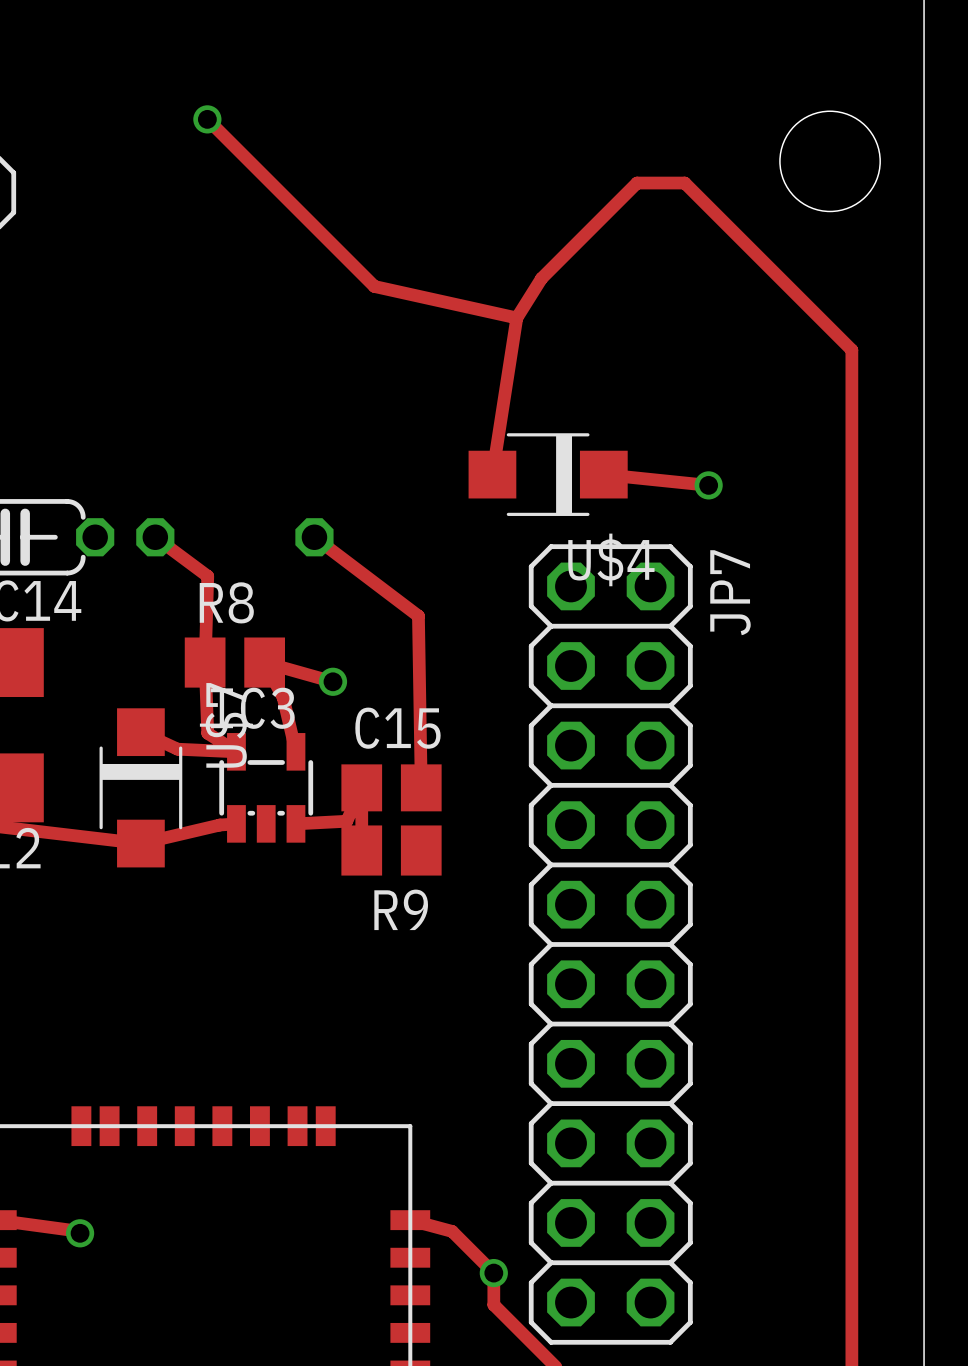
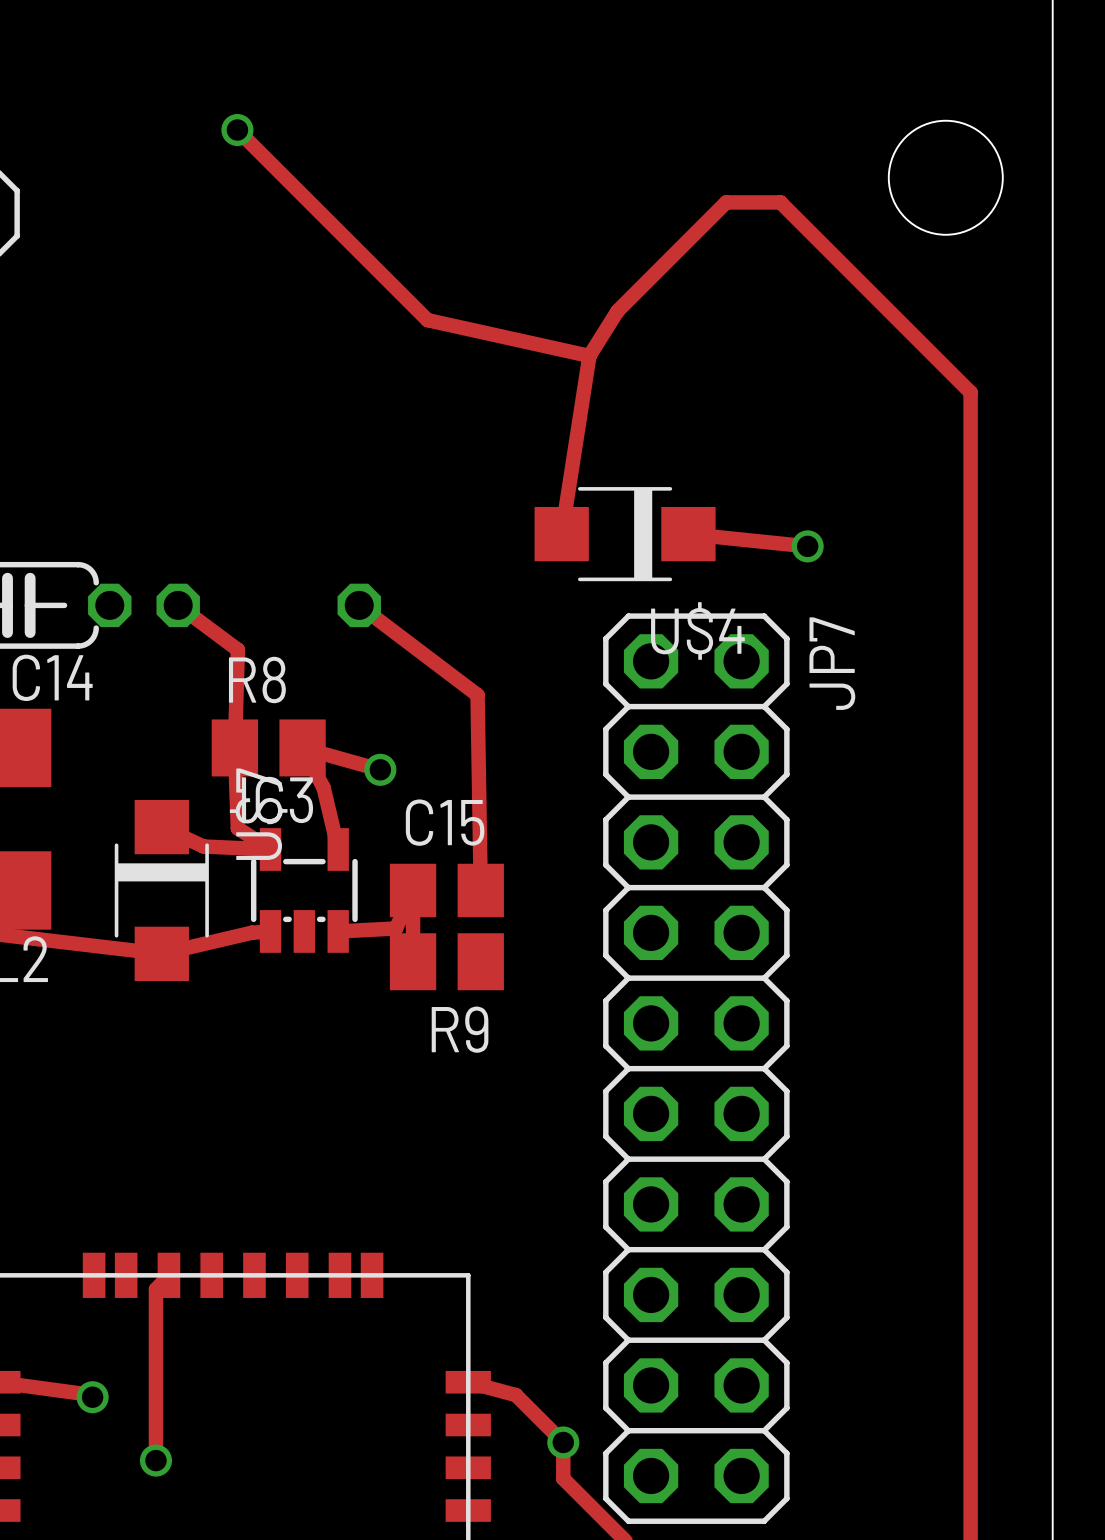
track: none -> (168, 1275) (155, 1289) (155, 1460)
via: none -> (155, 1460)

